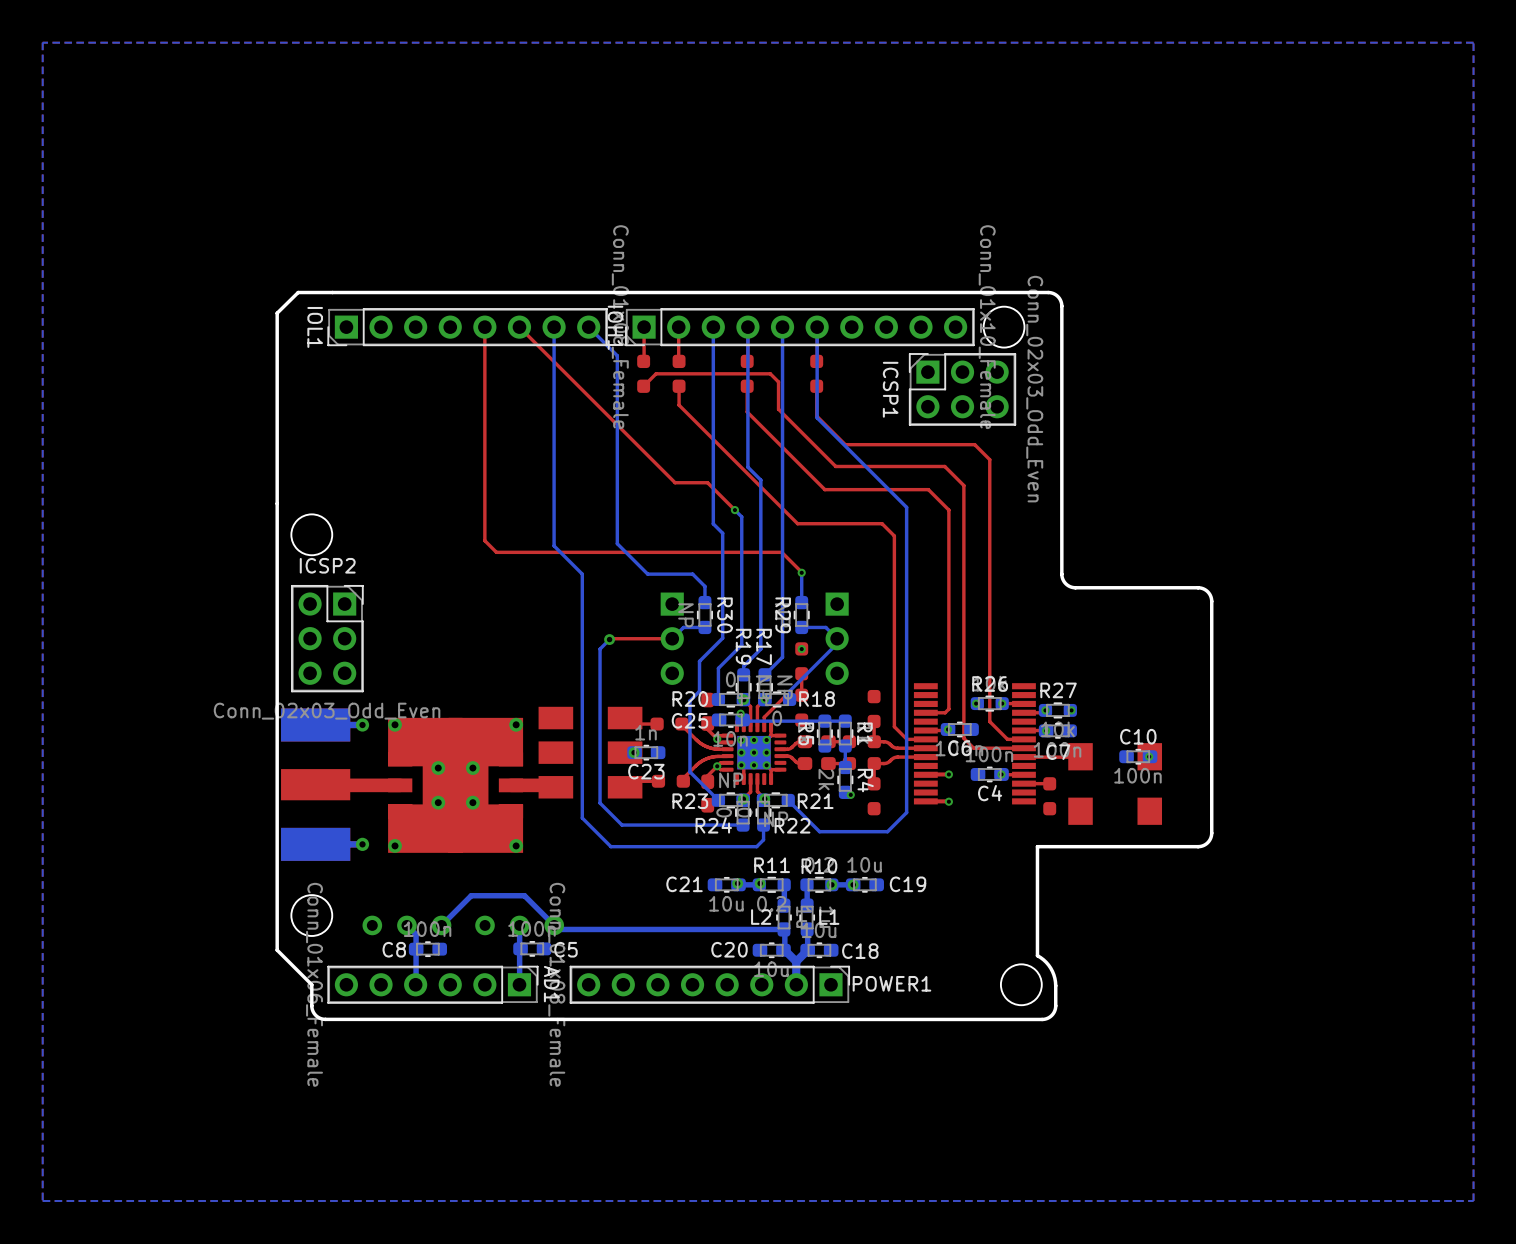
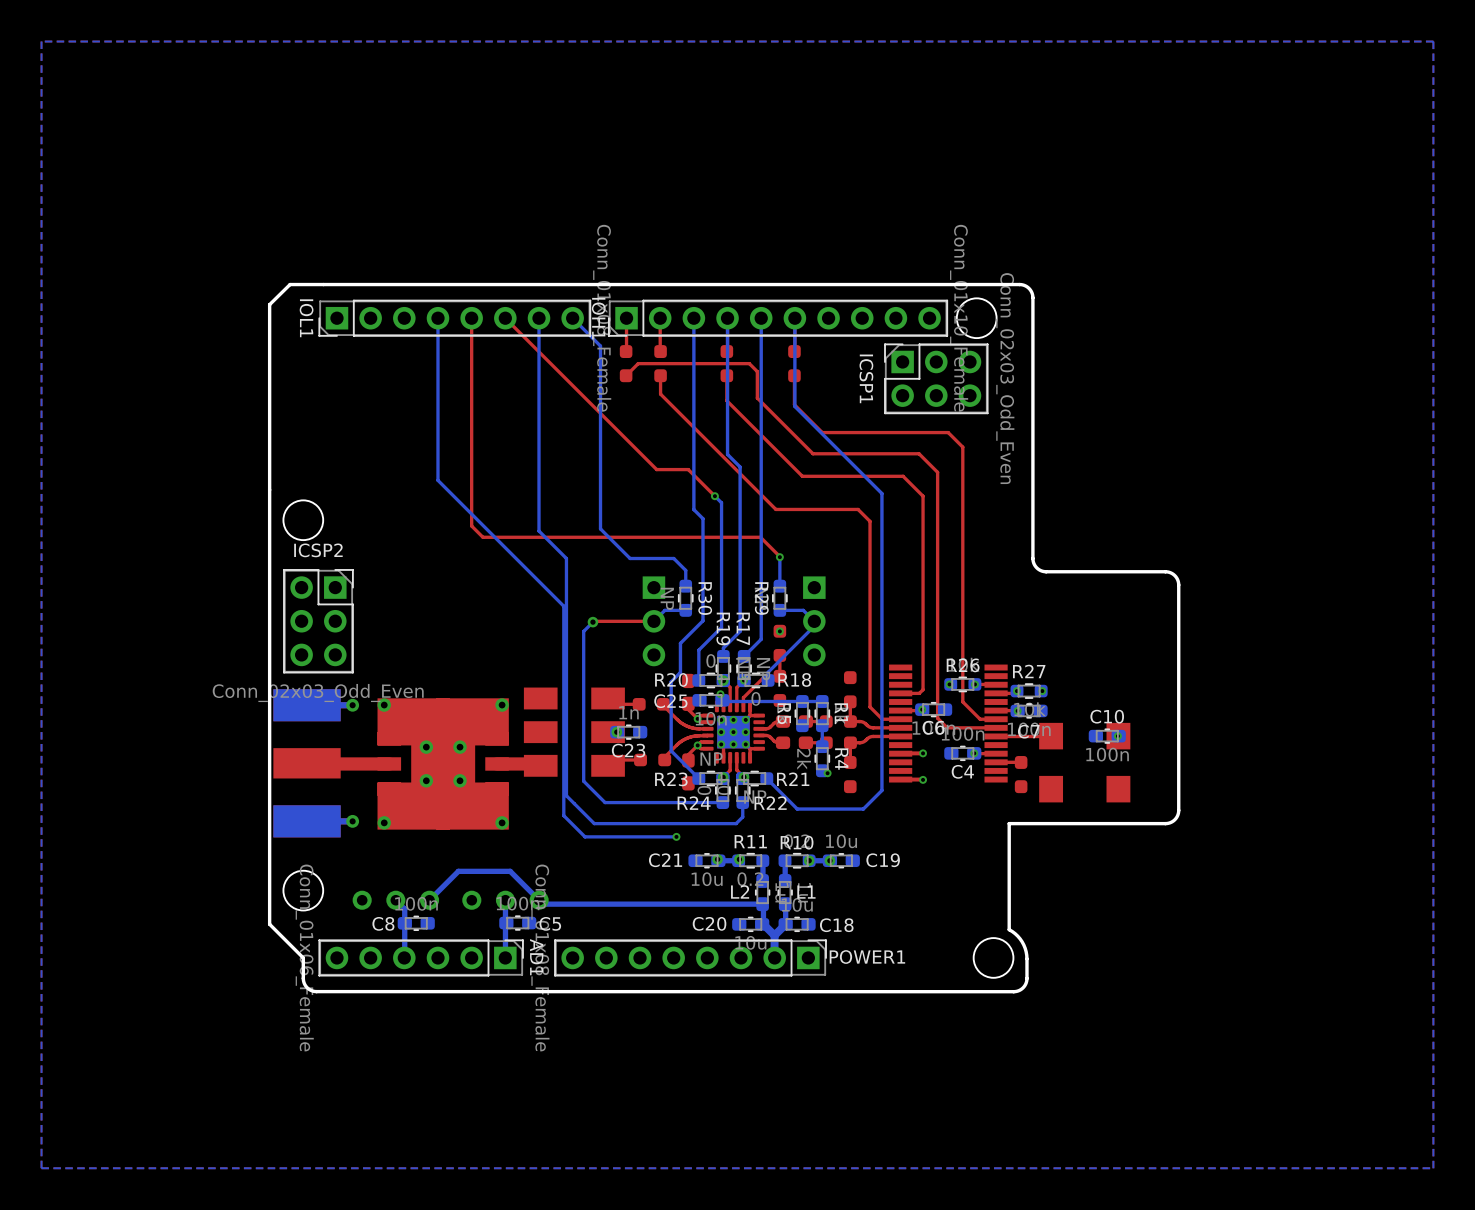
bottom track: none -> (437, 318) (437, 480) (563, 606) (563, 815) (585, 836) (676, 836)
via: none -> (676, 836)

